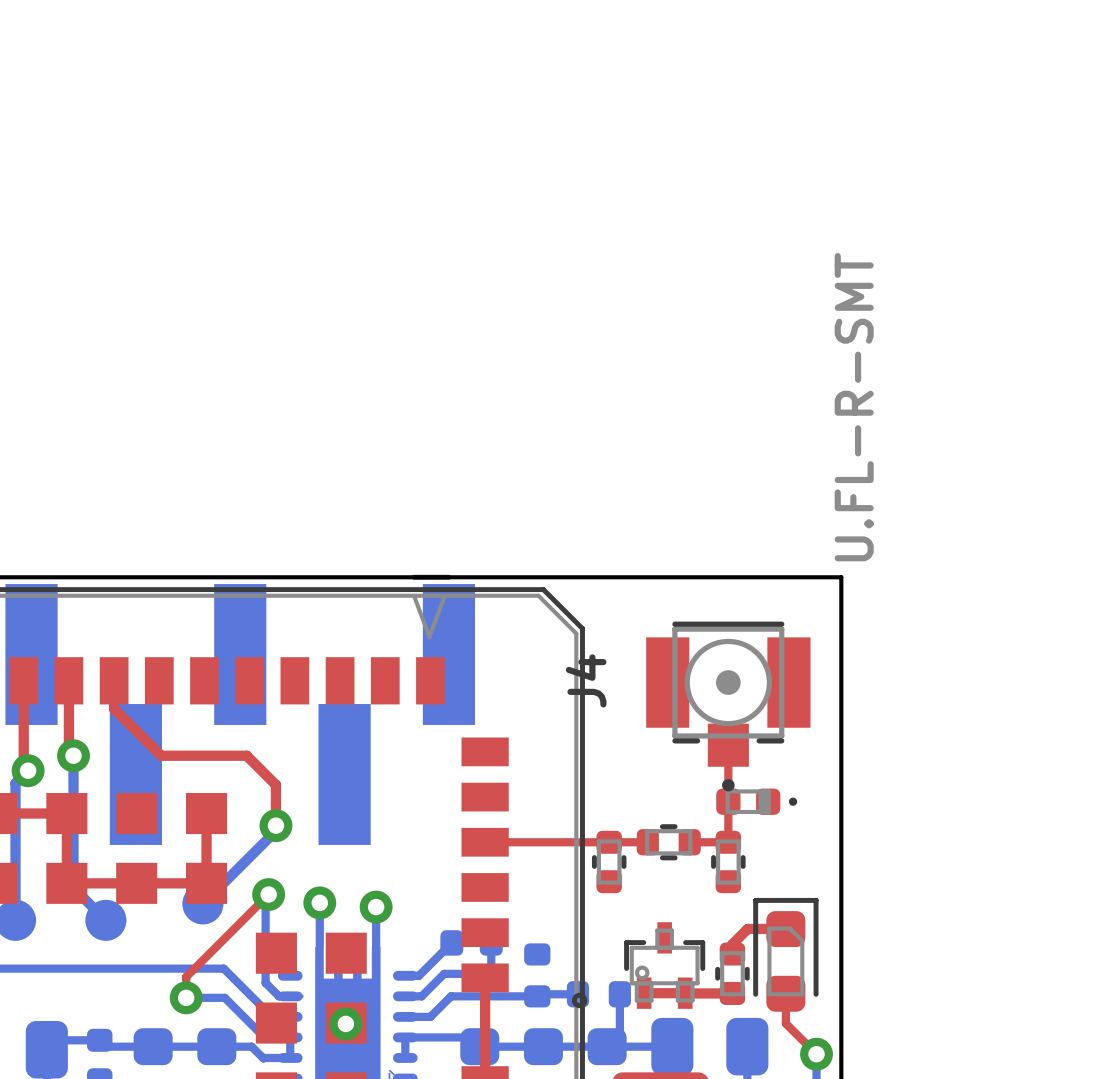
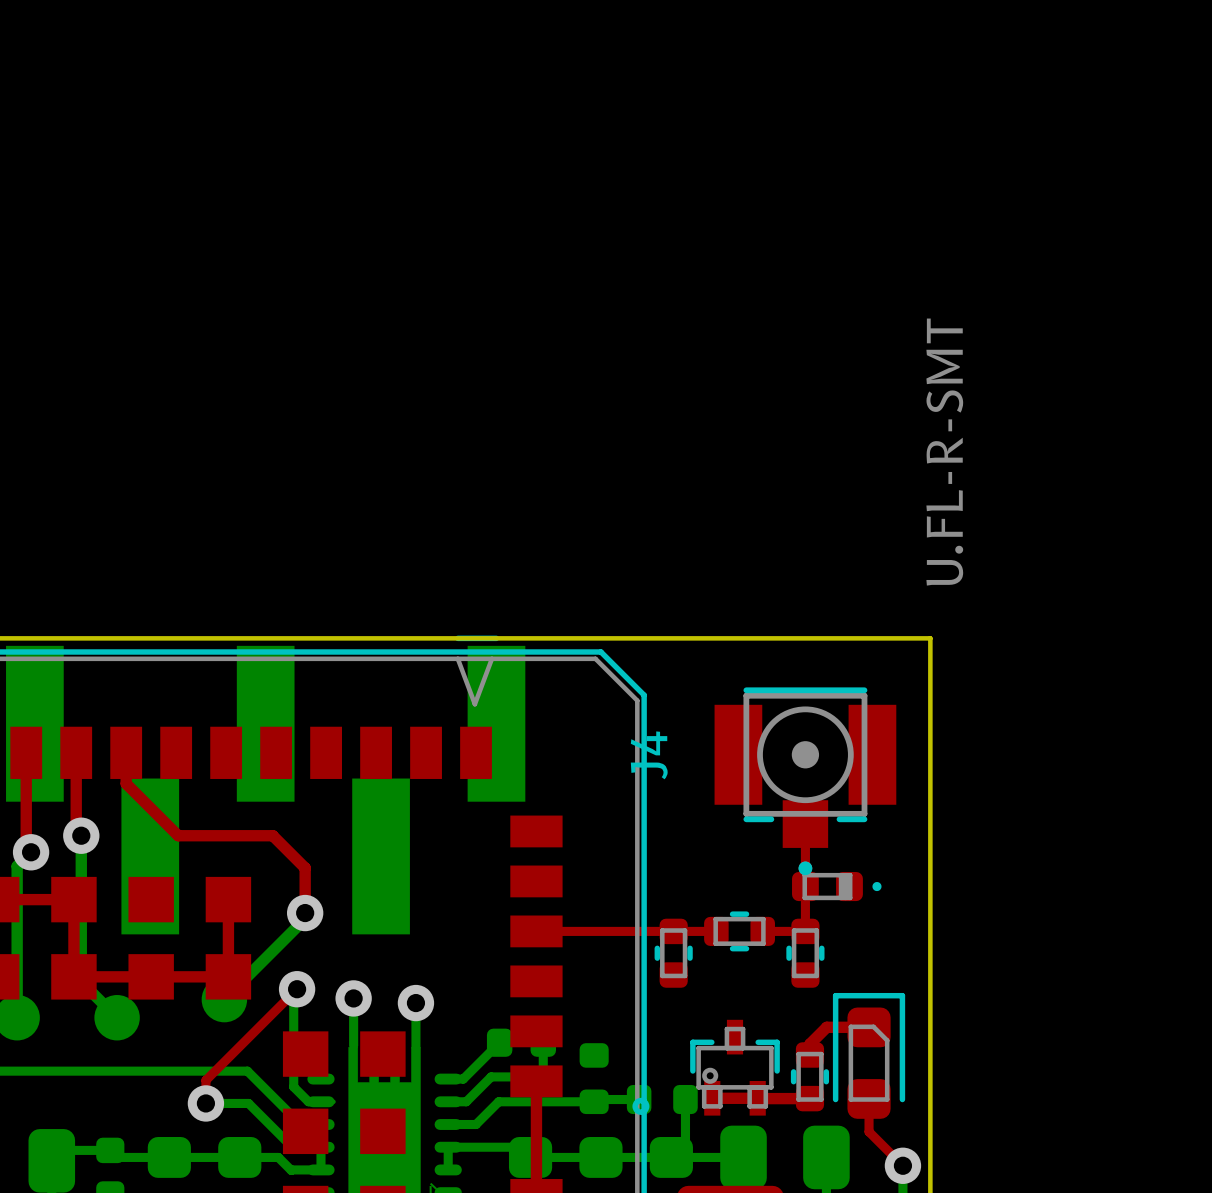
via: (345, 1023) -> none

